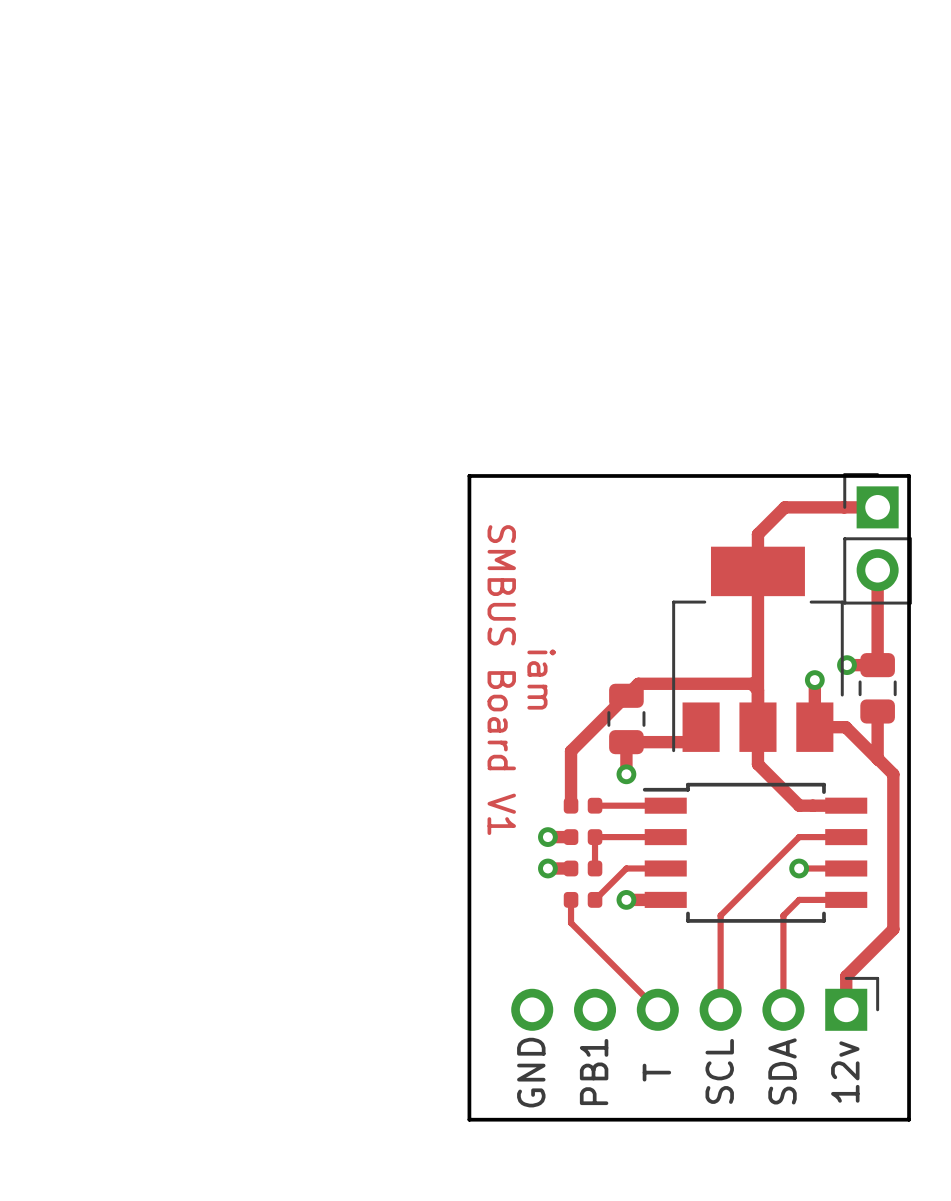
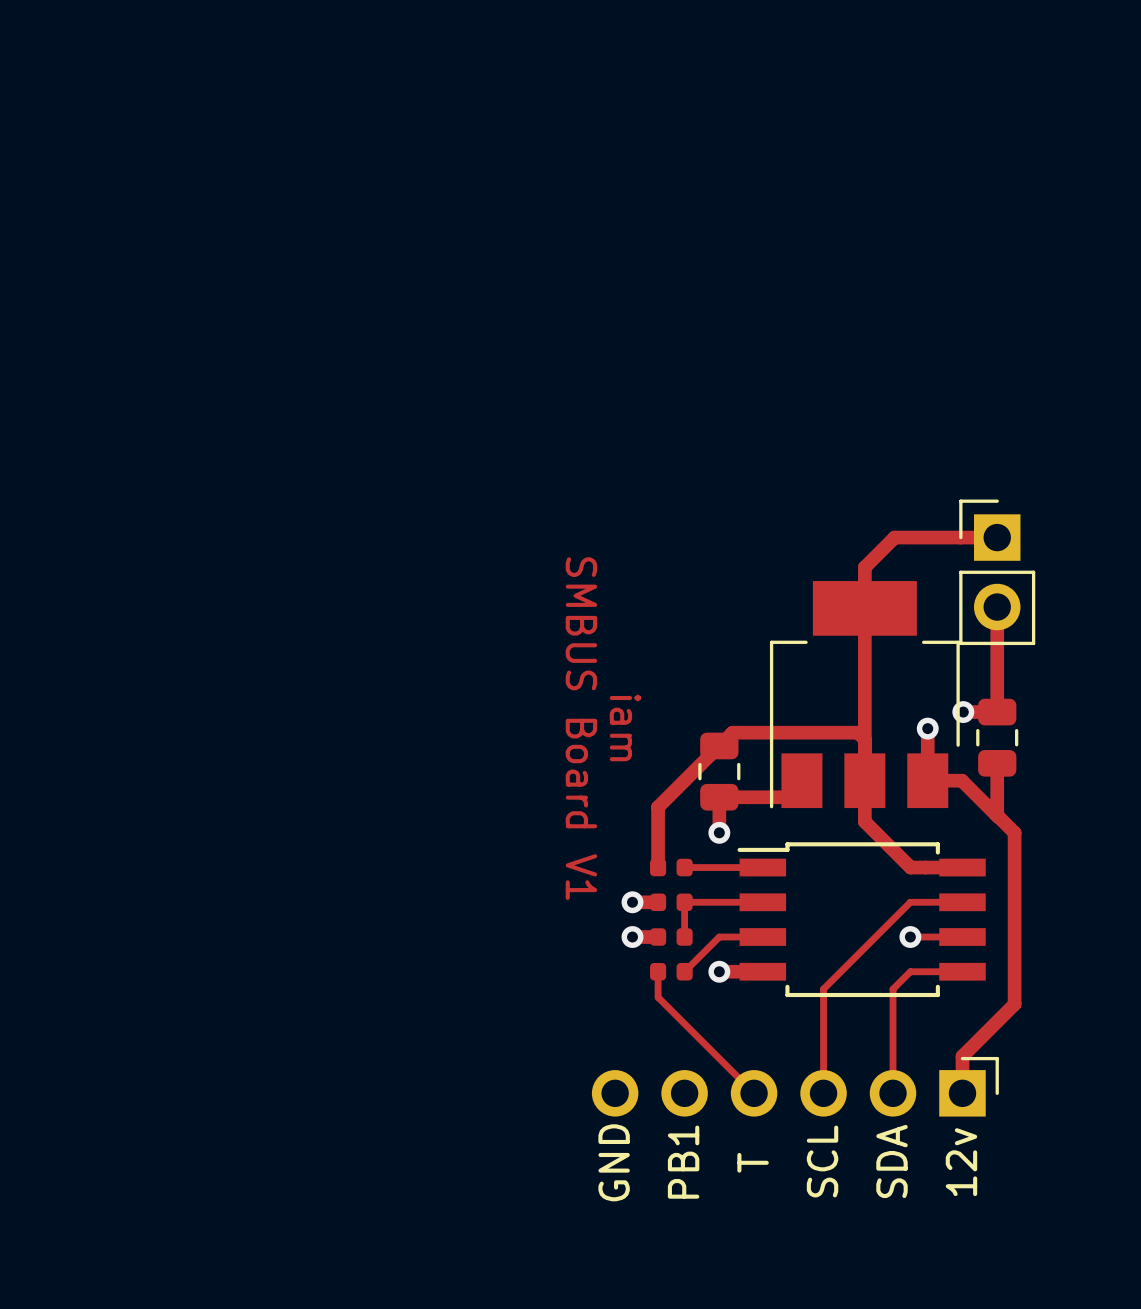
board edge: (469, 475) (469, 1119) (909, 1119) (909, 475) (469, 475) -> none

